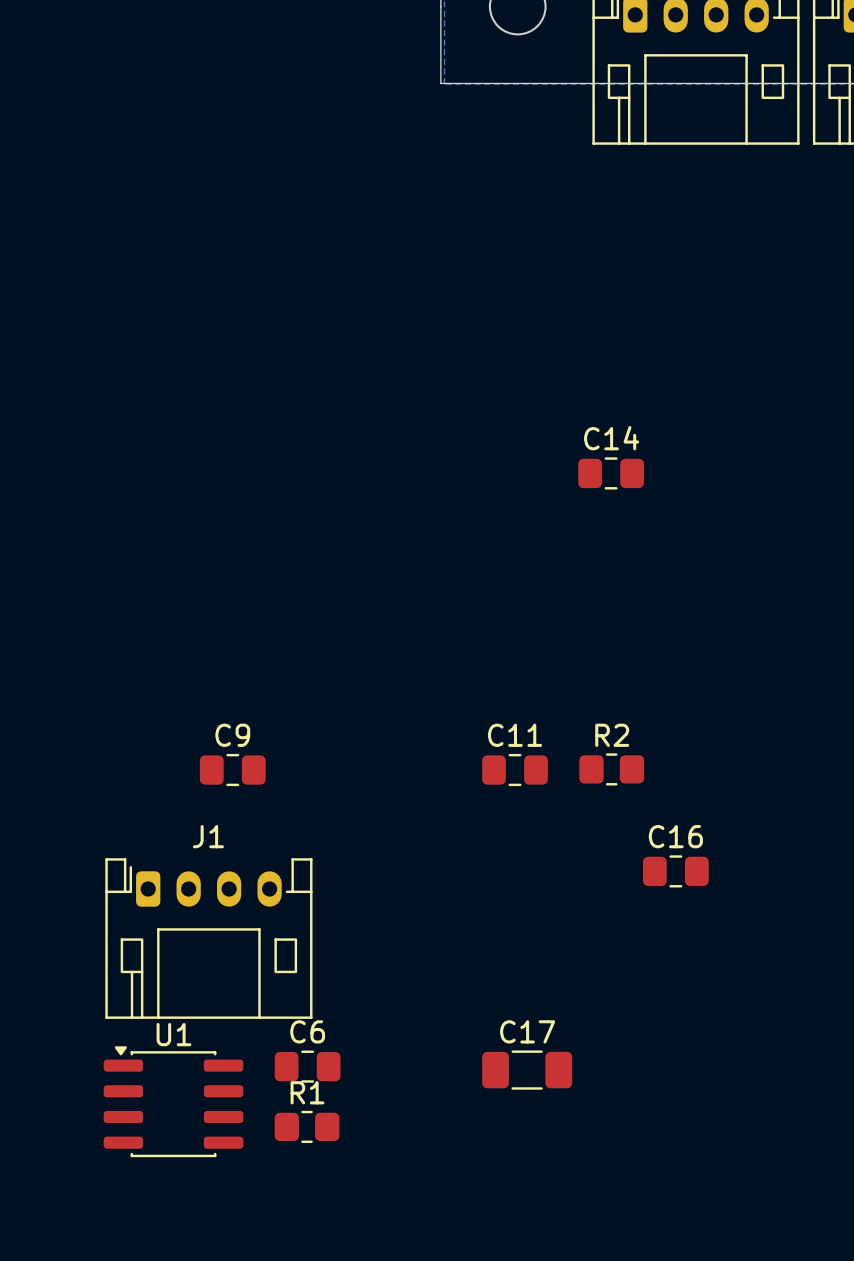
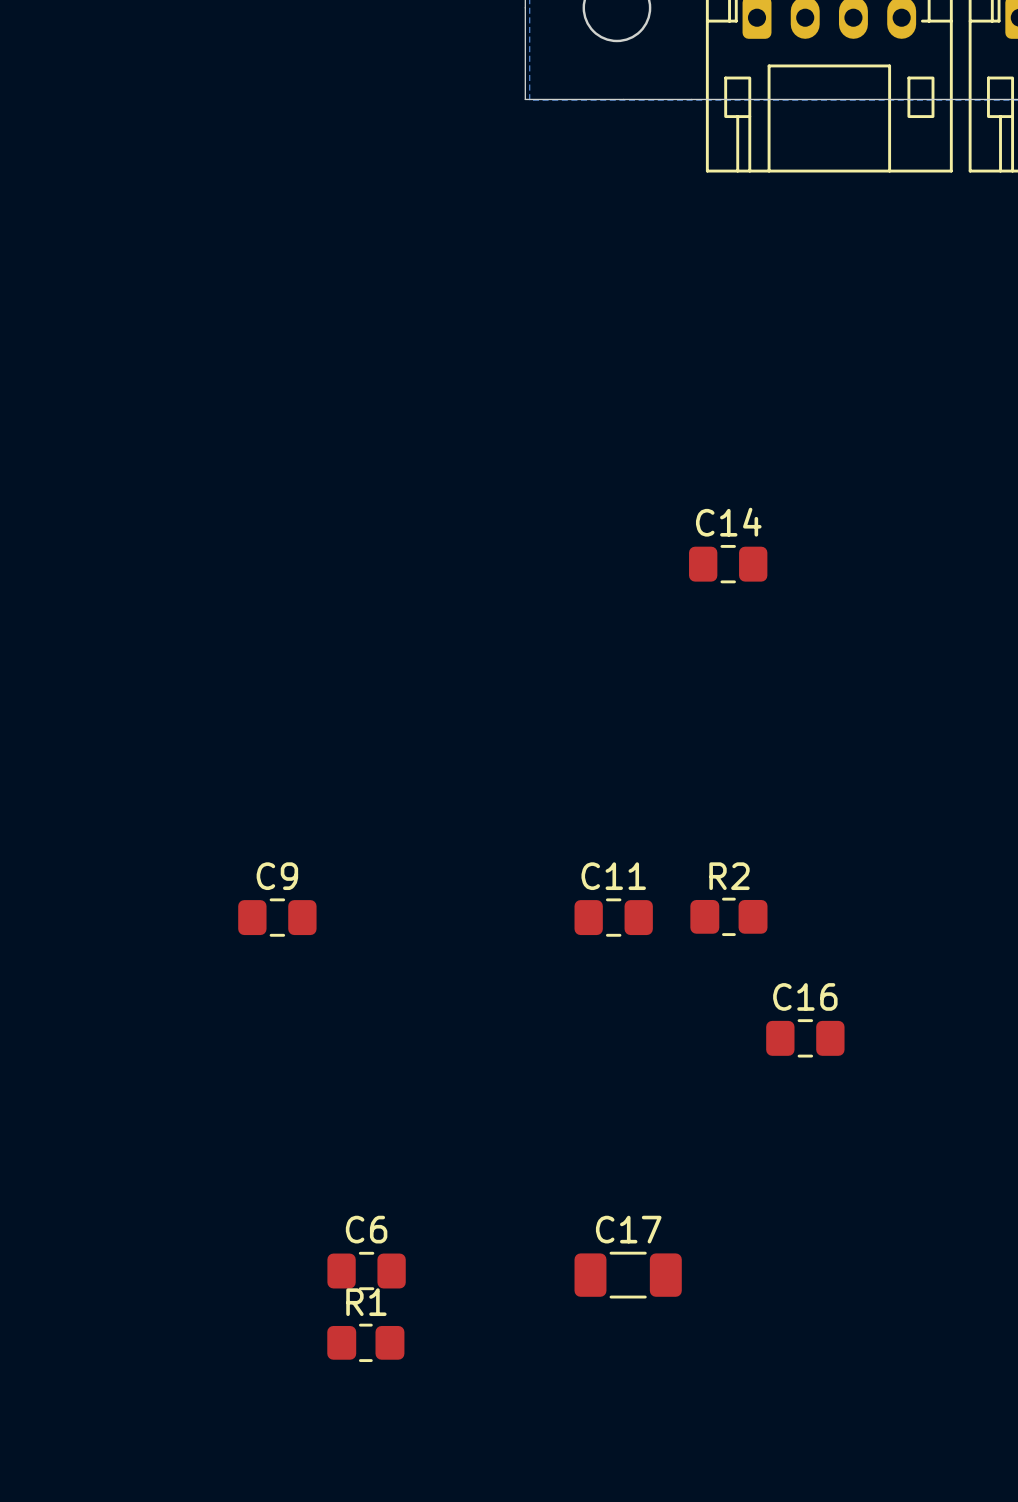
J1: (208, 938) -> none
U1: (173, 1101) -> none

